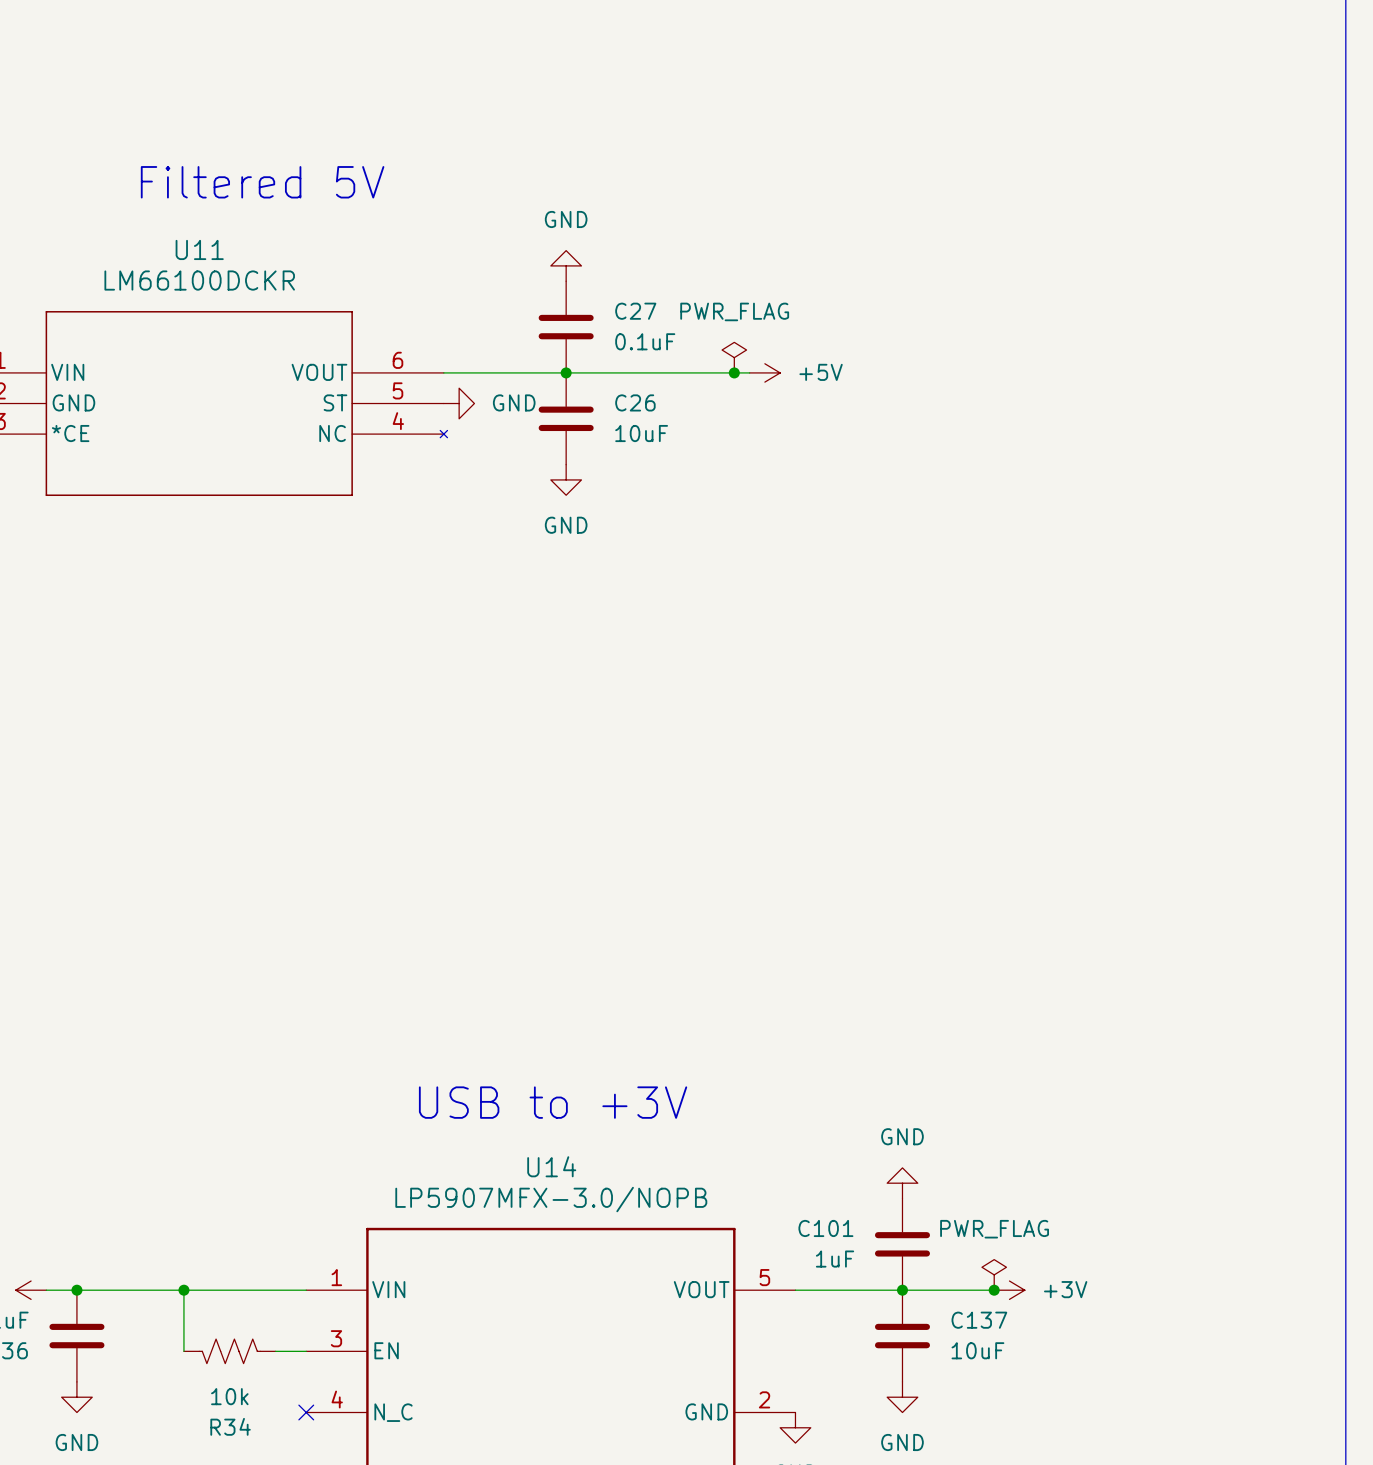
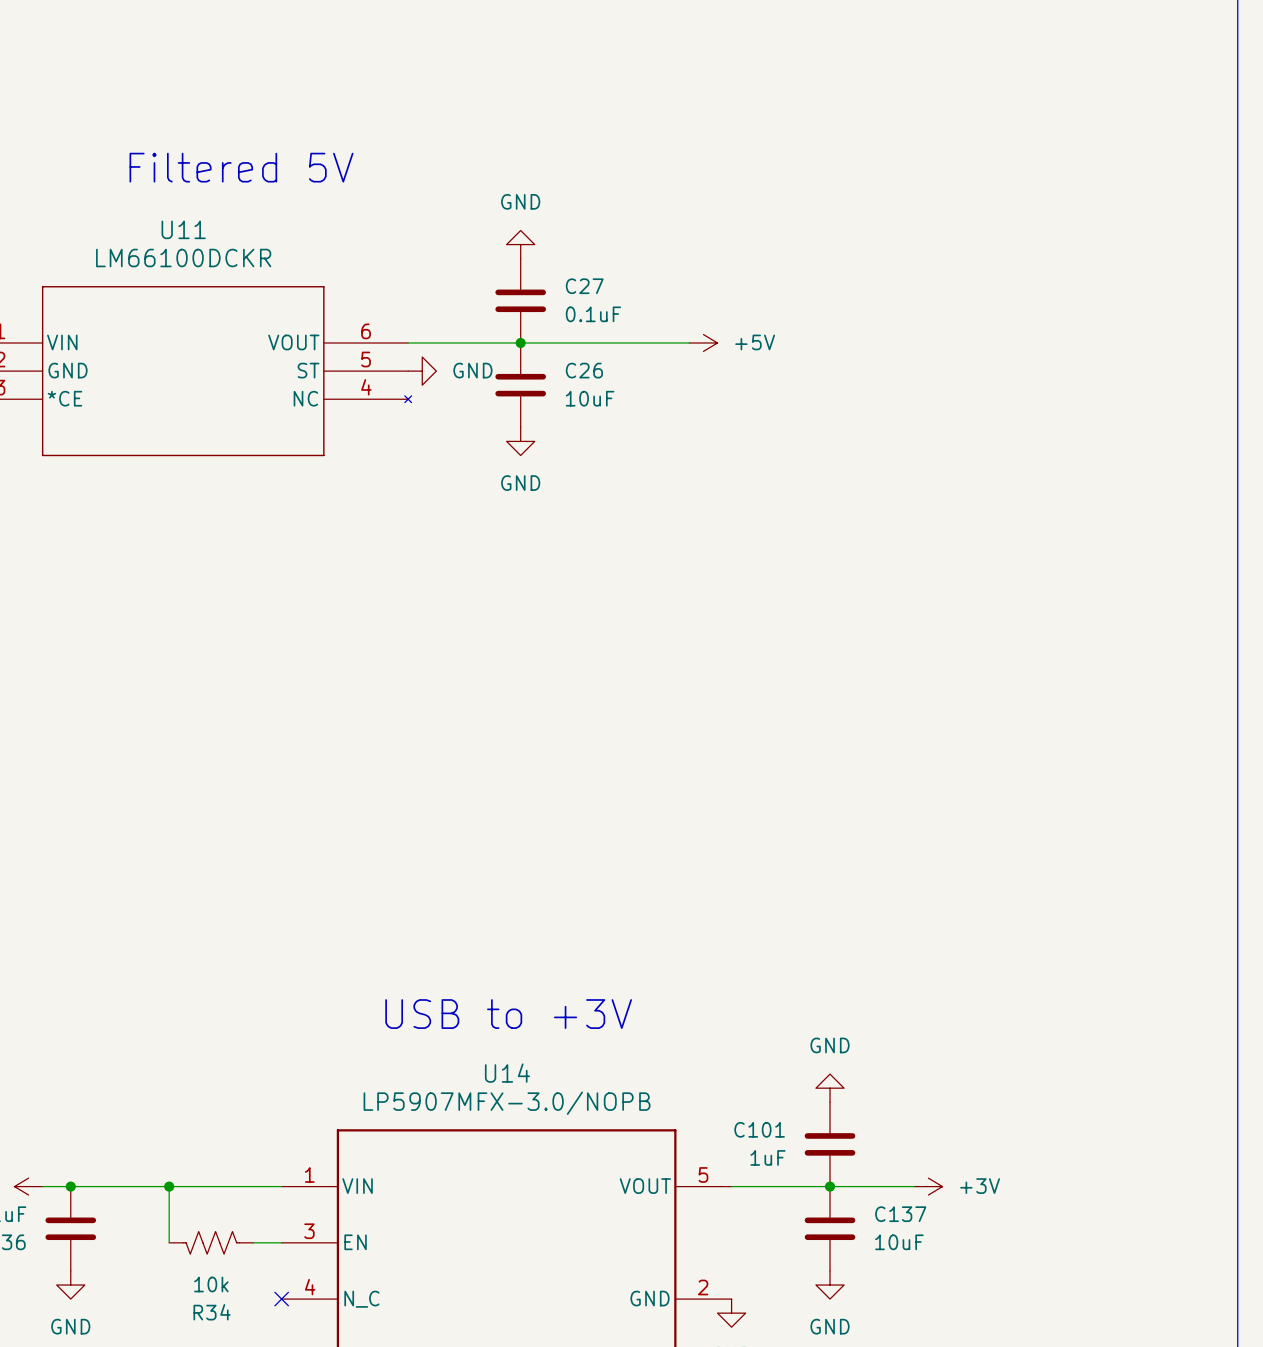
power symbol: PWR_FLAG (734, 357) -> none
junction: (734, 372) -> none
power symbol: PWR_FLAG (994, 1274) -> none
junction: (994, 1290) -> none

